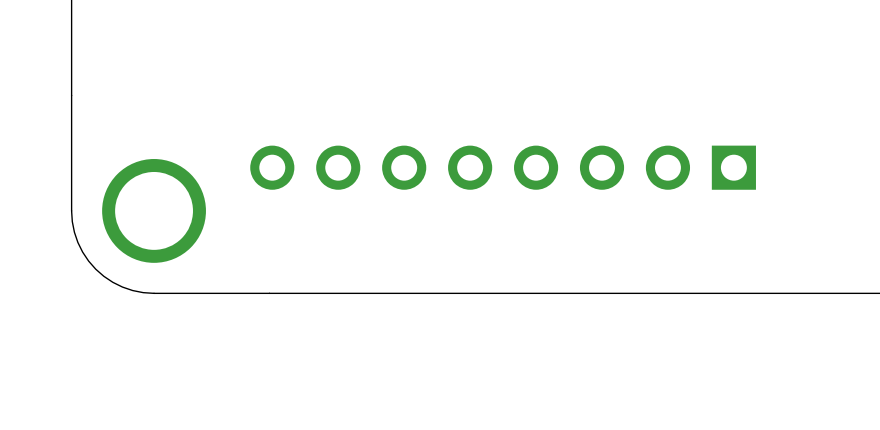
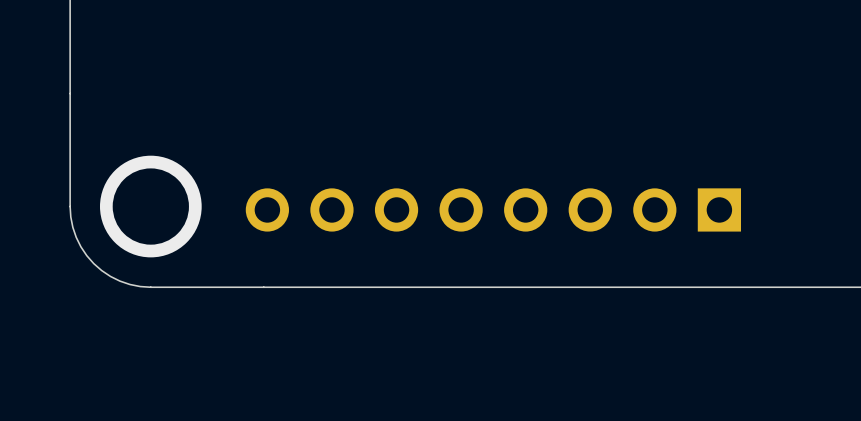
part position: (503, 167) -> (493, 209)

